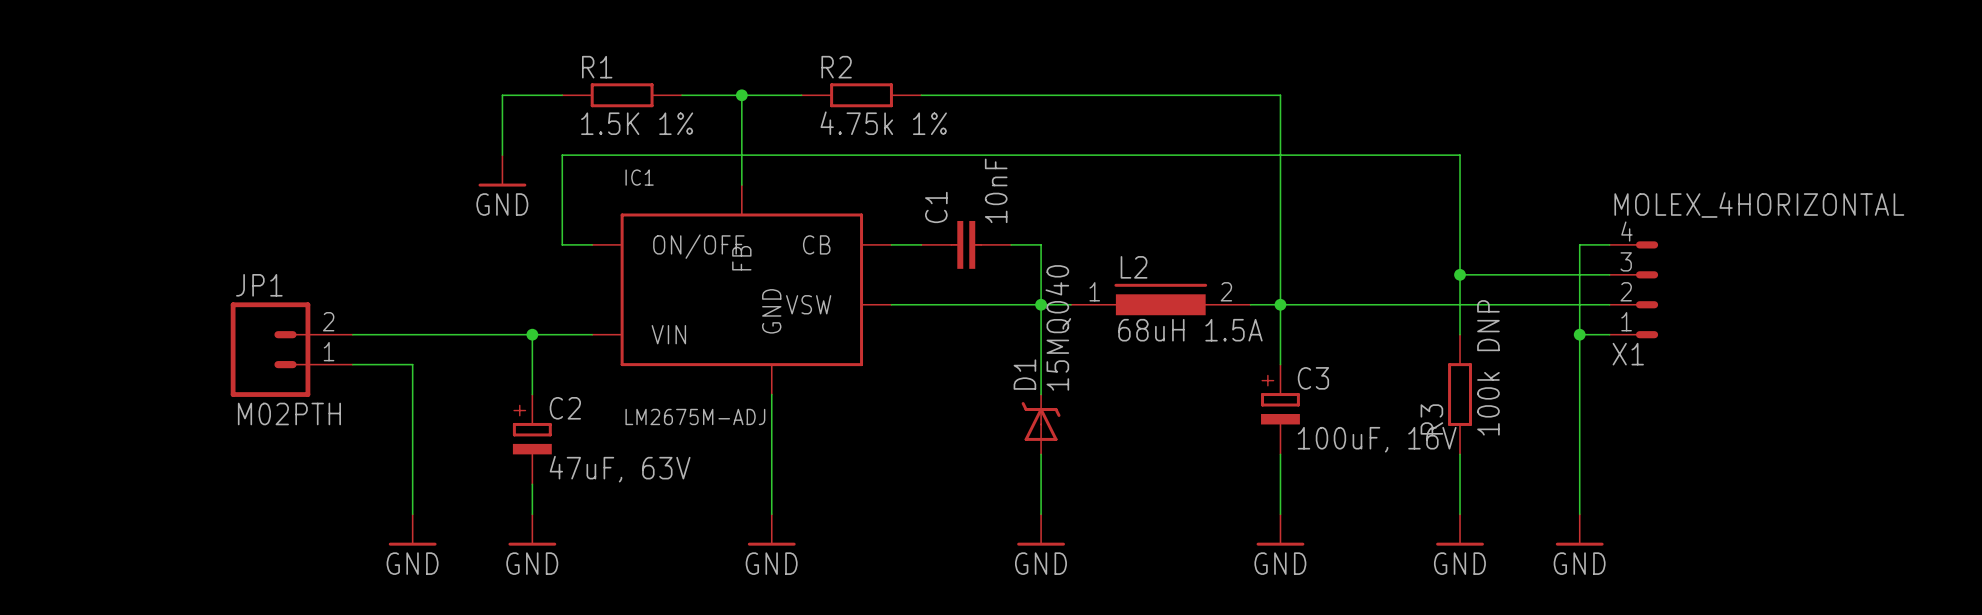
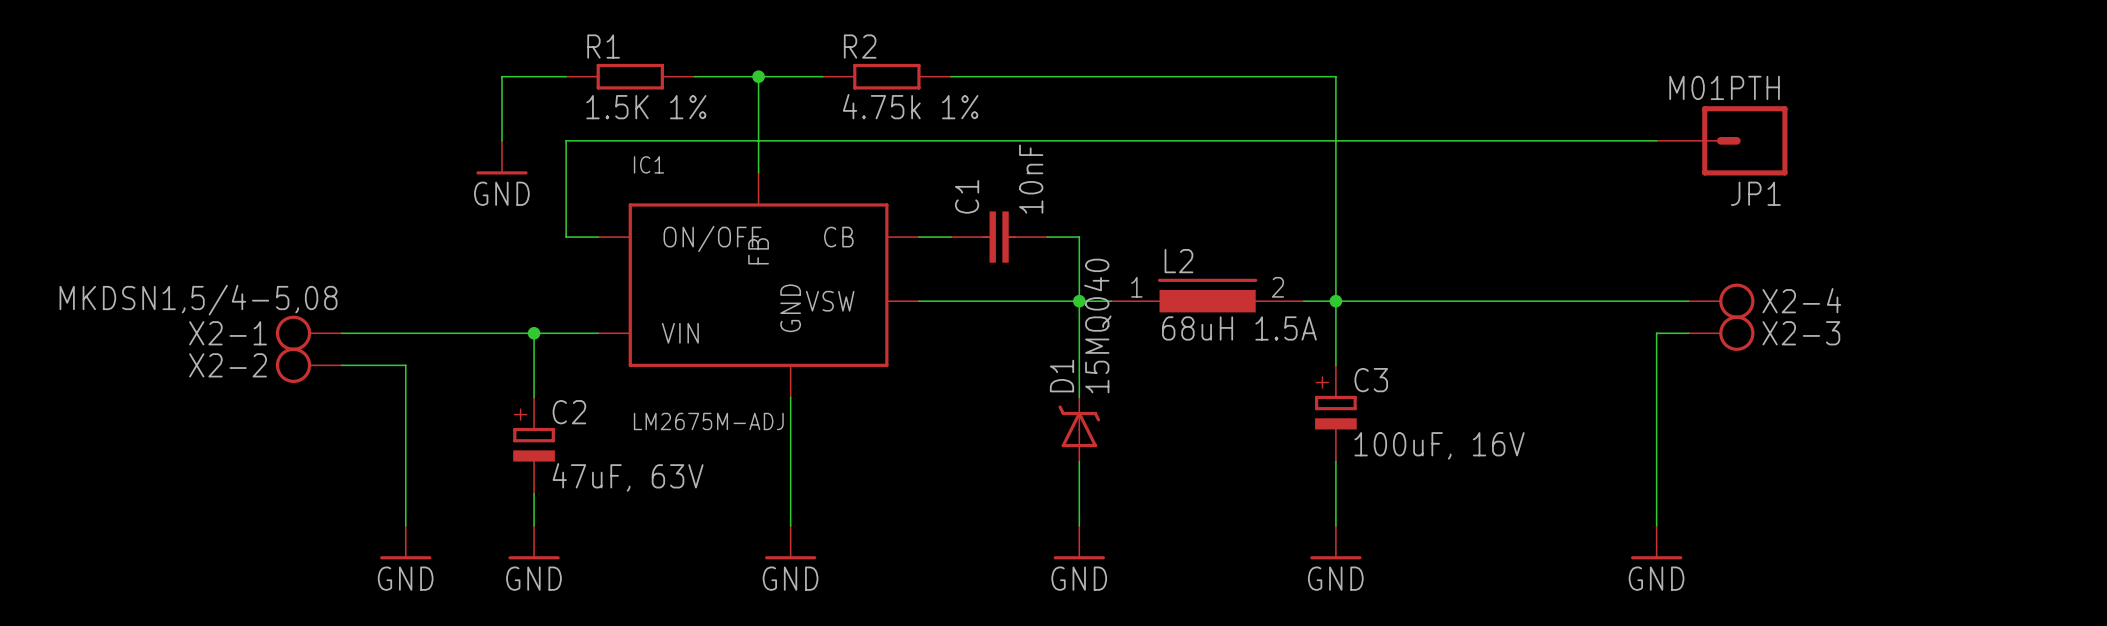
wire: (1460, 155) (1460, 334) -> (1528, 140) (1656, 140)
wire: (1609, 244) (1579, 244) (1579, 334) -> none
wire: (1460, 274) (1609, 274) -> none
junction: (1460, 274) -> none
JP1 name position: JP1 (259, 285) -> JP1 (1755, 193)
X1: MOLEX_4HORIZONTAL (1633, 289) -> none
JP1 symbol: [230, 302, 353, 397] -> [1656, 106, 1788, 176]
X2-4: none -> (1721, 301)
X2-1: none -> MKDSN1,5/4-5,08 (308, 333)
junction: (1579, 334) -> none
X2-3: none -> (1721, 333)
X2-2: none -> (308, 365)
R3: 100k DNP (1460, 394) -> none
JP1 value: M02PTH (289, 413) -> M01PTH (1724, 87)
wire: (1460, 454) (1460, 514) -> none
power symbol: GND (1460, 529) -> none

